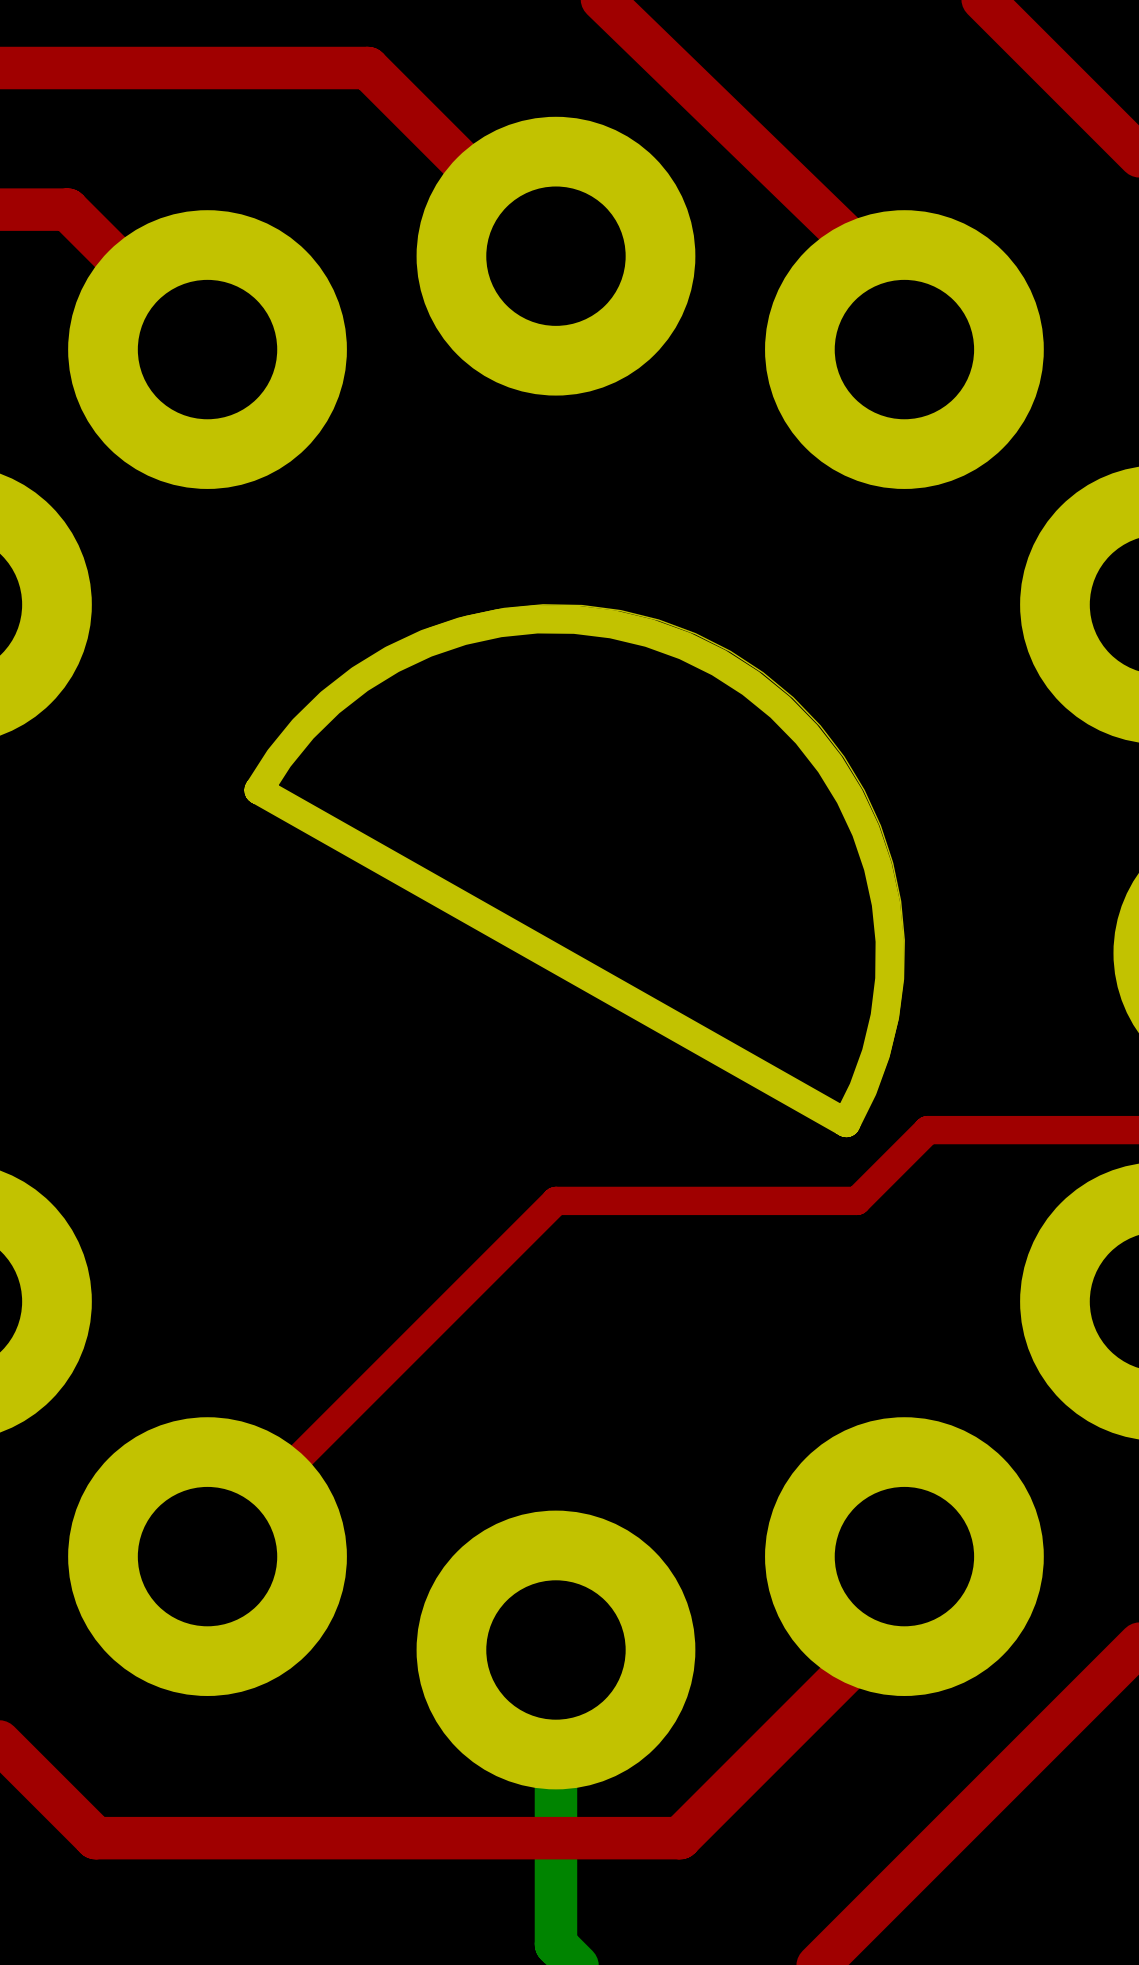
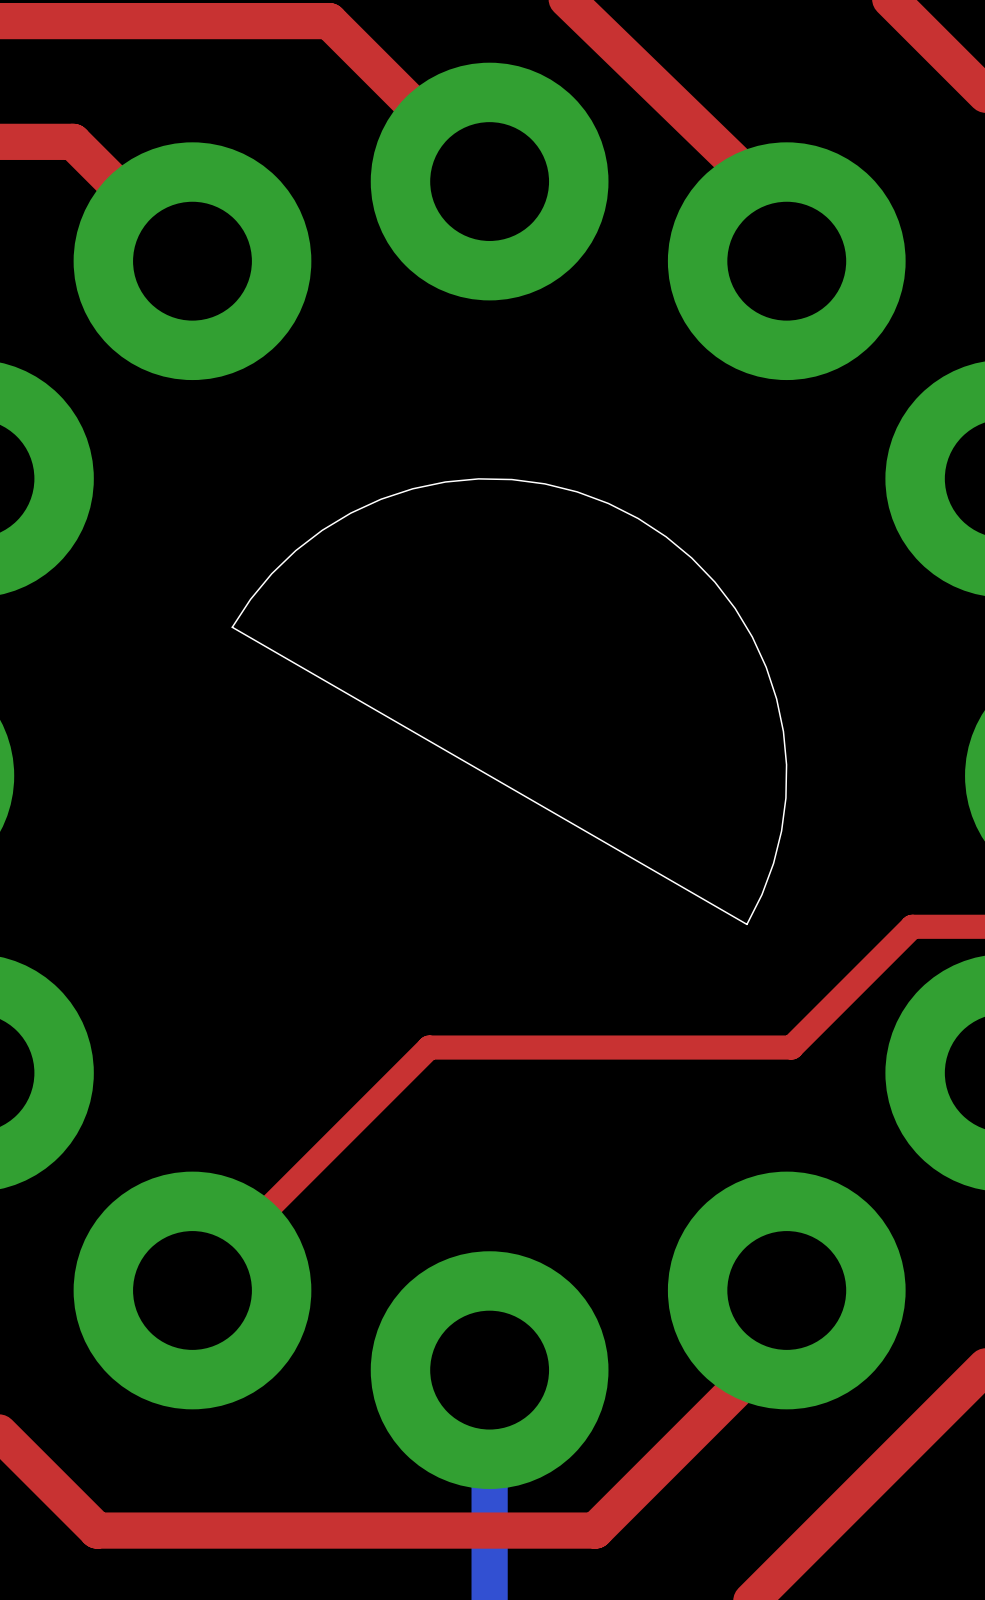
board edge: (258, 790) (846, 1123) (863, 1089) (875, 1053) (884, 1016) (889, 979) (889, 941) (885, 903) (877, 866) (865, 830) (849, 796) (829, 764) (806, 734) (780, 707) (750, 683) (718, 662) (684, 646) (649, 633) (612, 624) (574, 619) (536, 619) (499, 623) (462, 631) (426, 643) (392, 659) (359, 679) (330, 702) (302, 729) (279, 758) (258, 790) -> none
top track: (1051, 1130) (927, 1130) (856, 1200) (555, 1200) (485, 1271) -> (912, 926) (791, 1047) (429, 1047)

